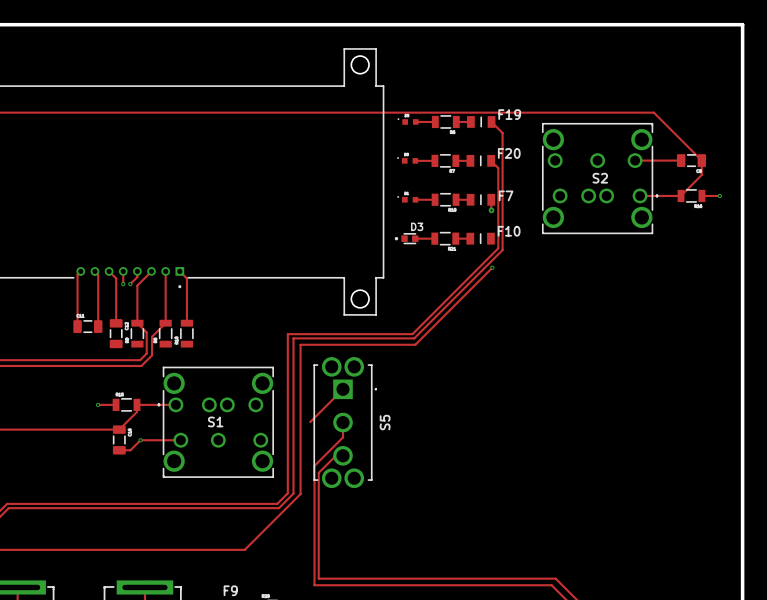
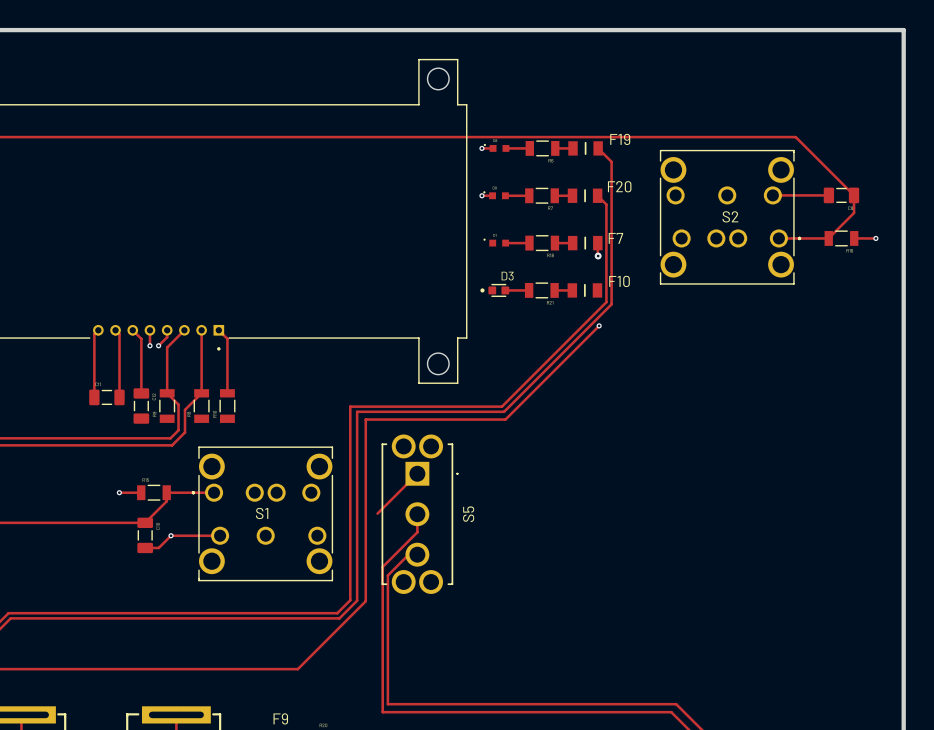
track: none -> (481, 148) (490, 148)
via: none -> (481, 148)
track: none -> (481, 195) (490, 195)
via: none -> (481, 195)

